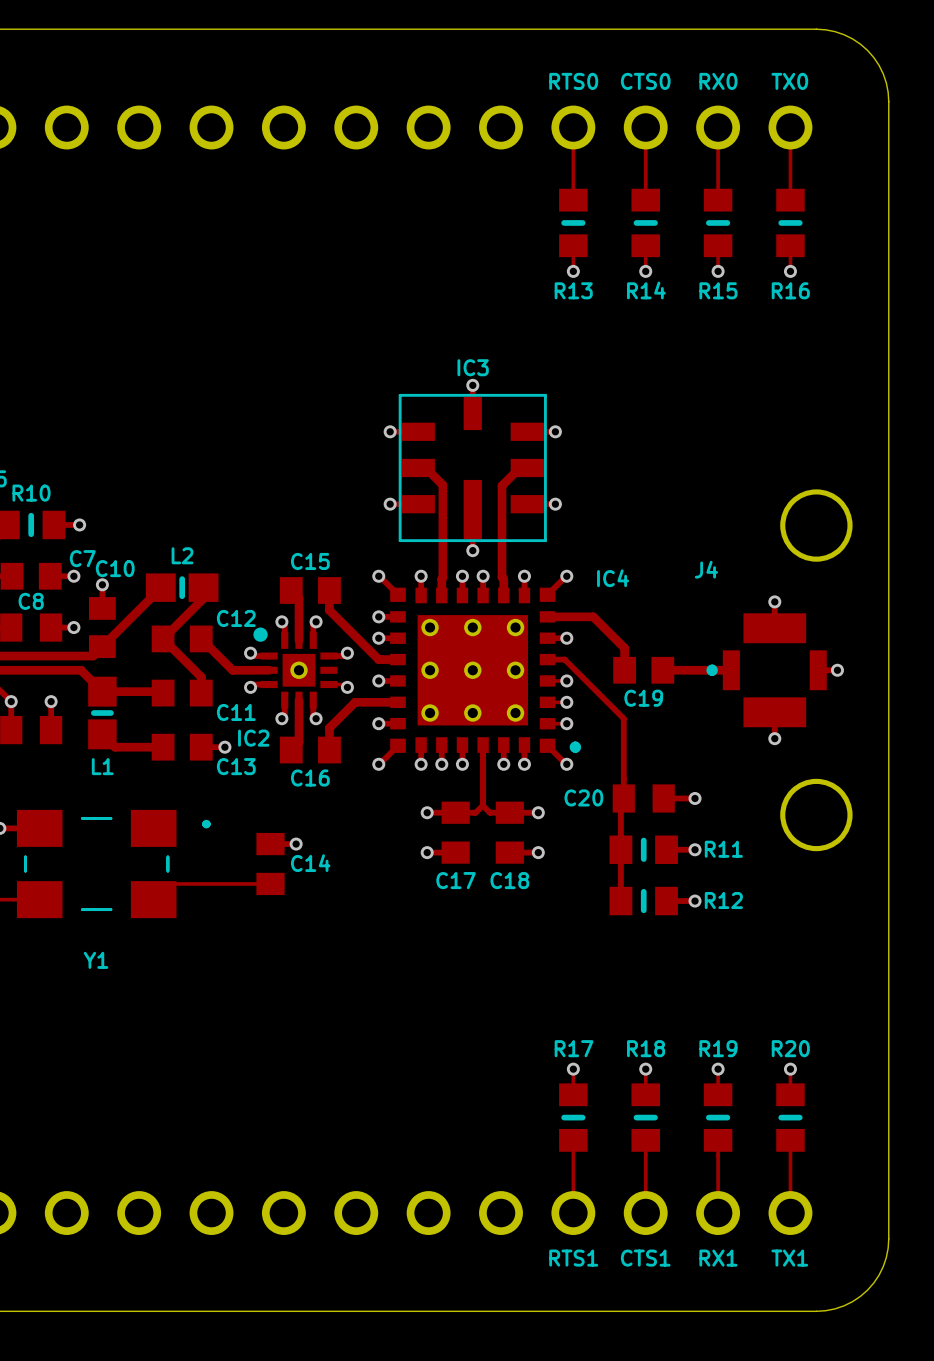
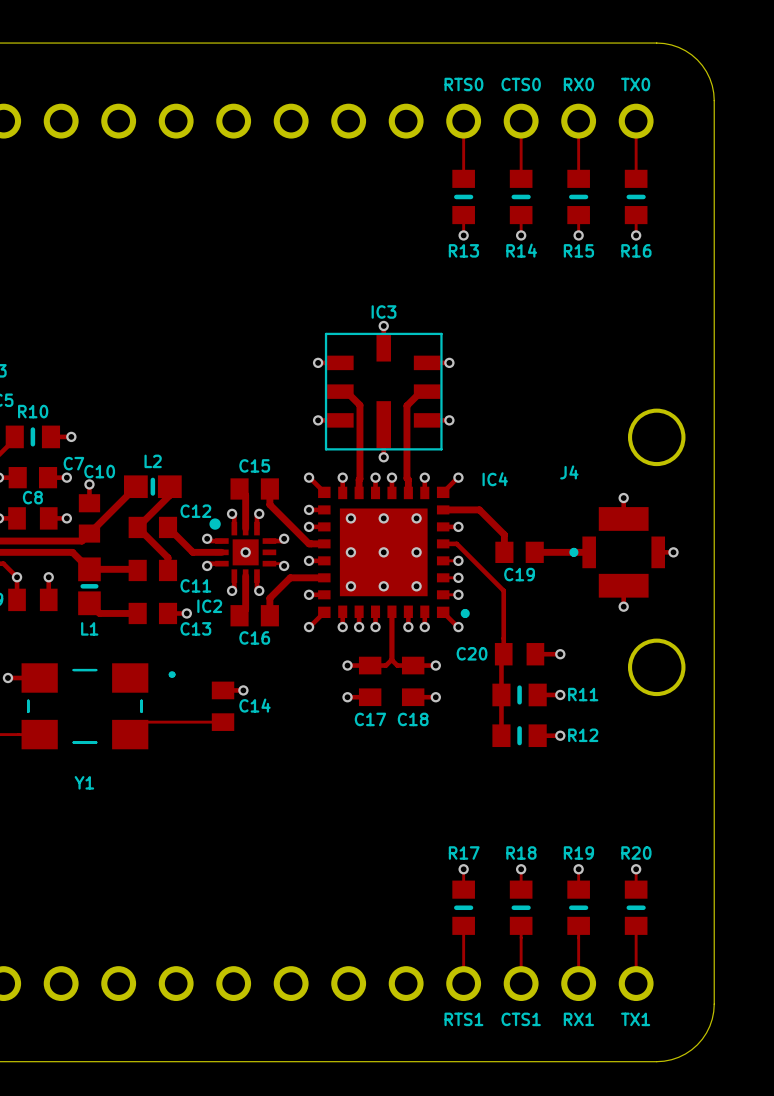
part footprint: [390, 587, 582, 753] -> [318, 486, 470, 619]
part footprint: [253, 627, 338, 709] -> [209, 518, 277, 583]
via: none -> (350, 518)
via: none -> (383, 518)
via: none -> (416, 518)
via: none -> (245, 552)
via: none -> (350, 552)
via: none -> (383, 552)
via: none -> (416, 552)
via: none -> (350, 586)
via: none -> (383, 586)
via: none -> (416, 586)

